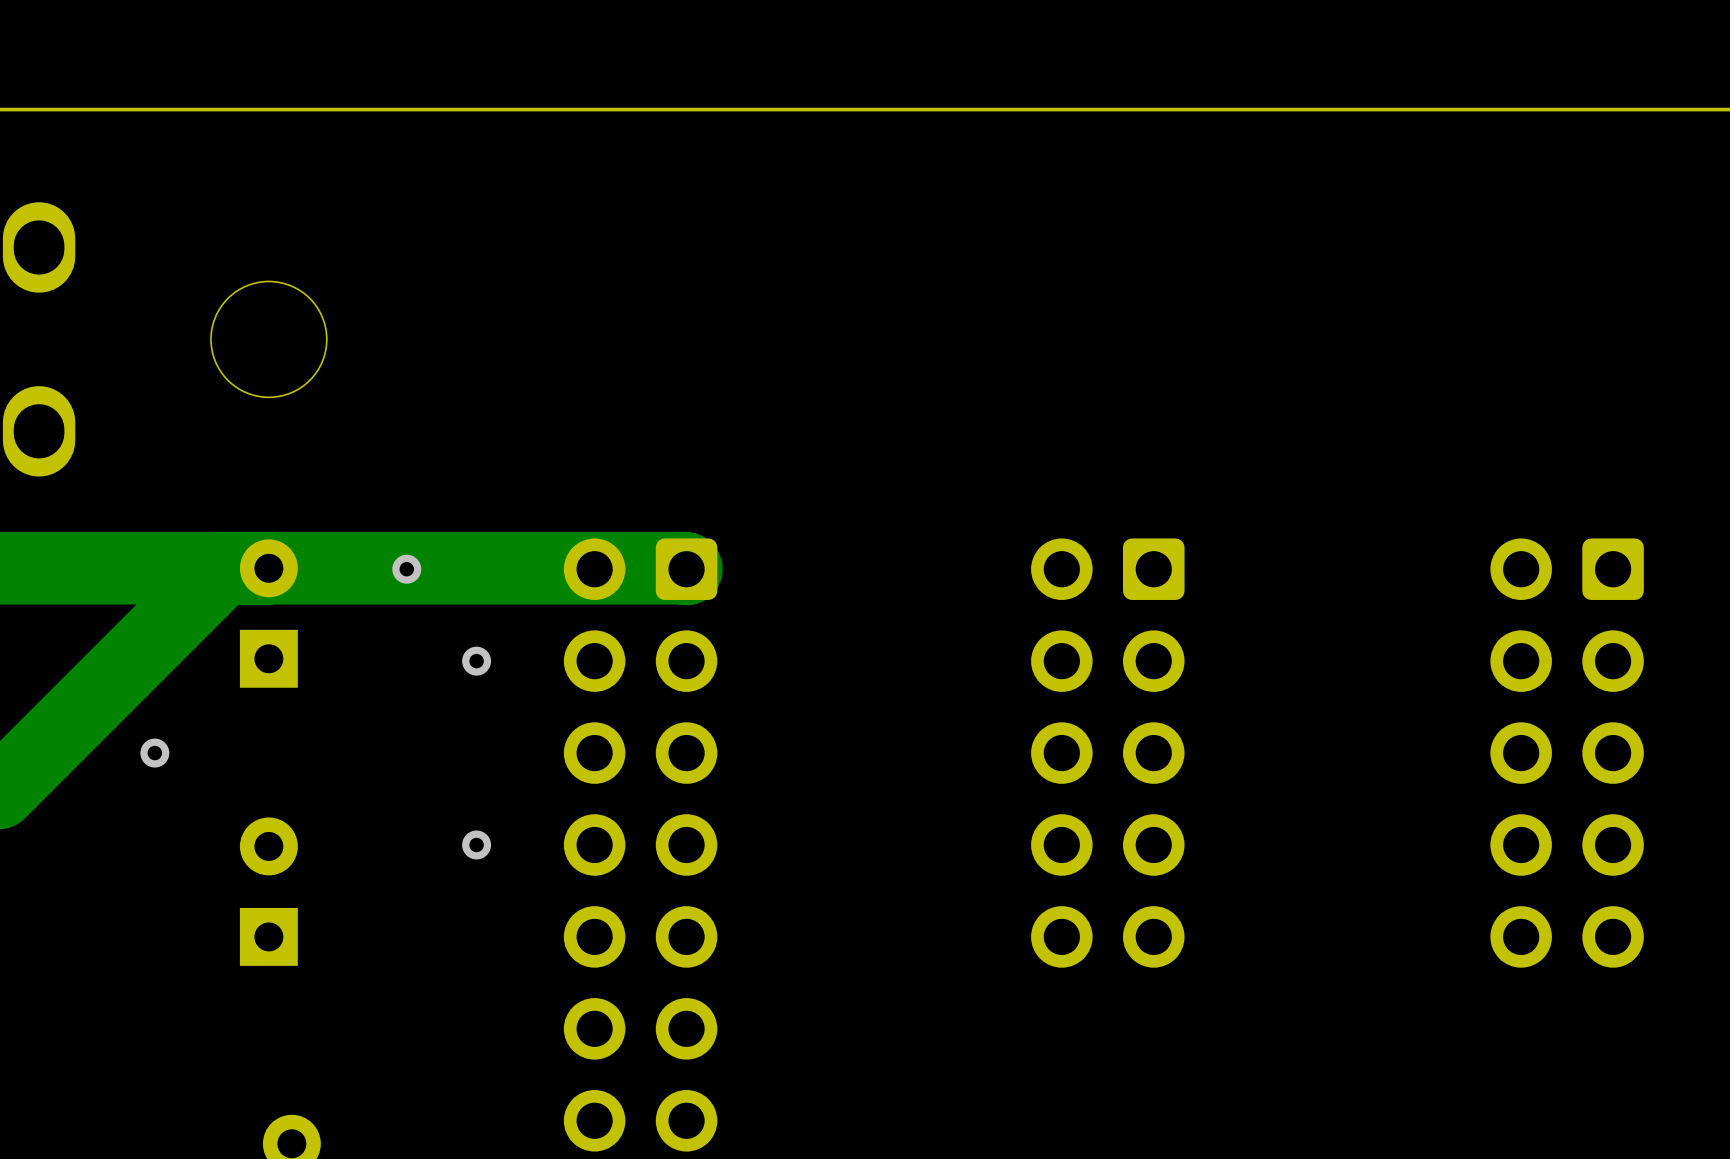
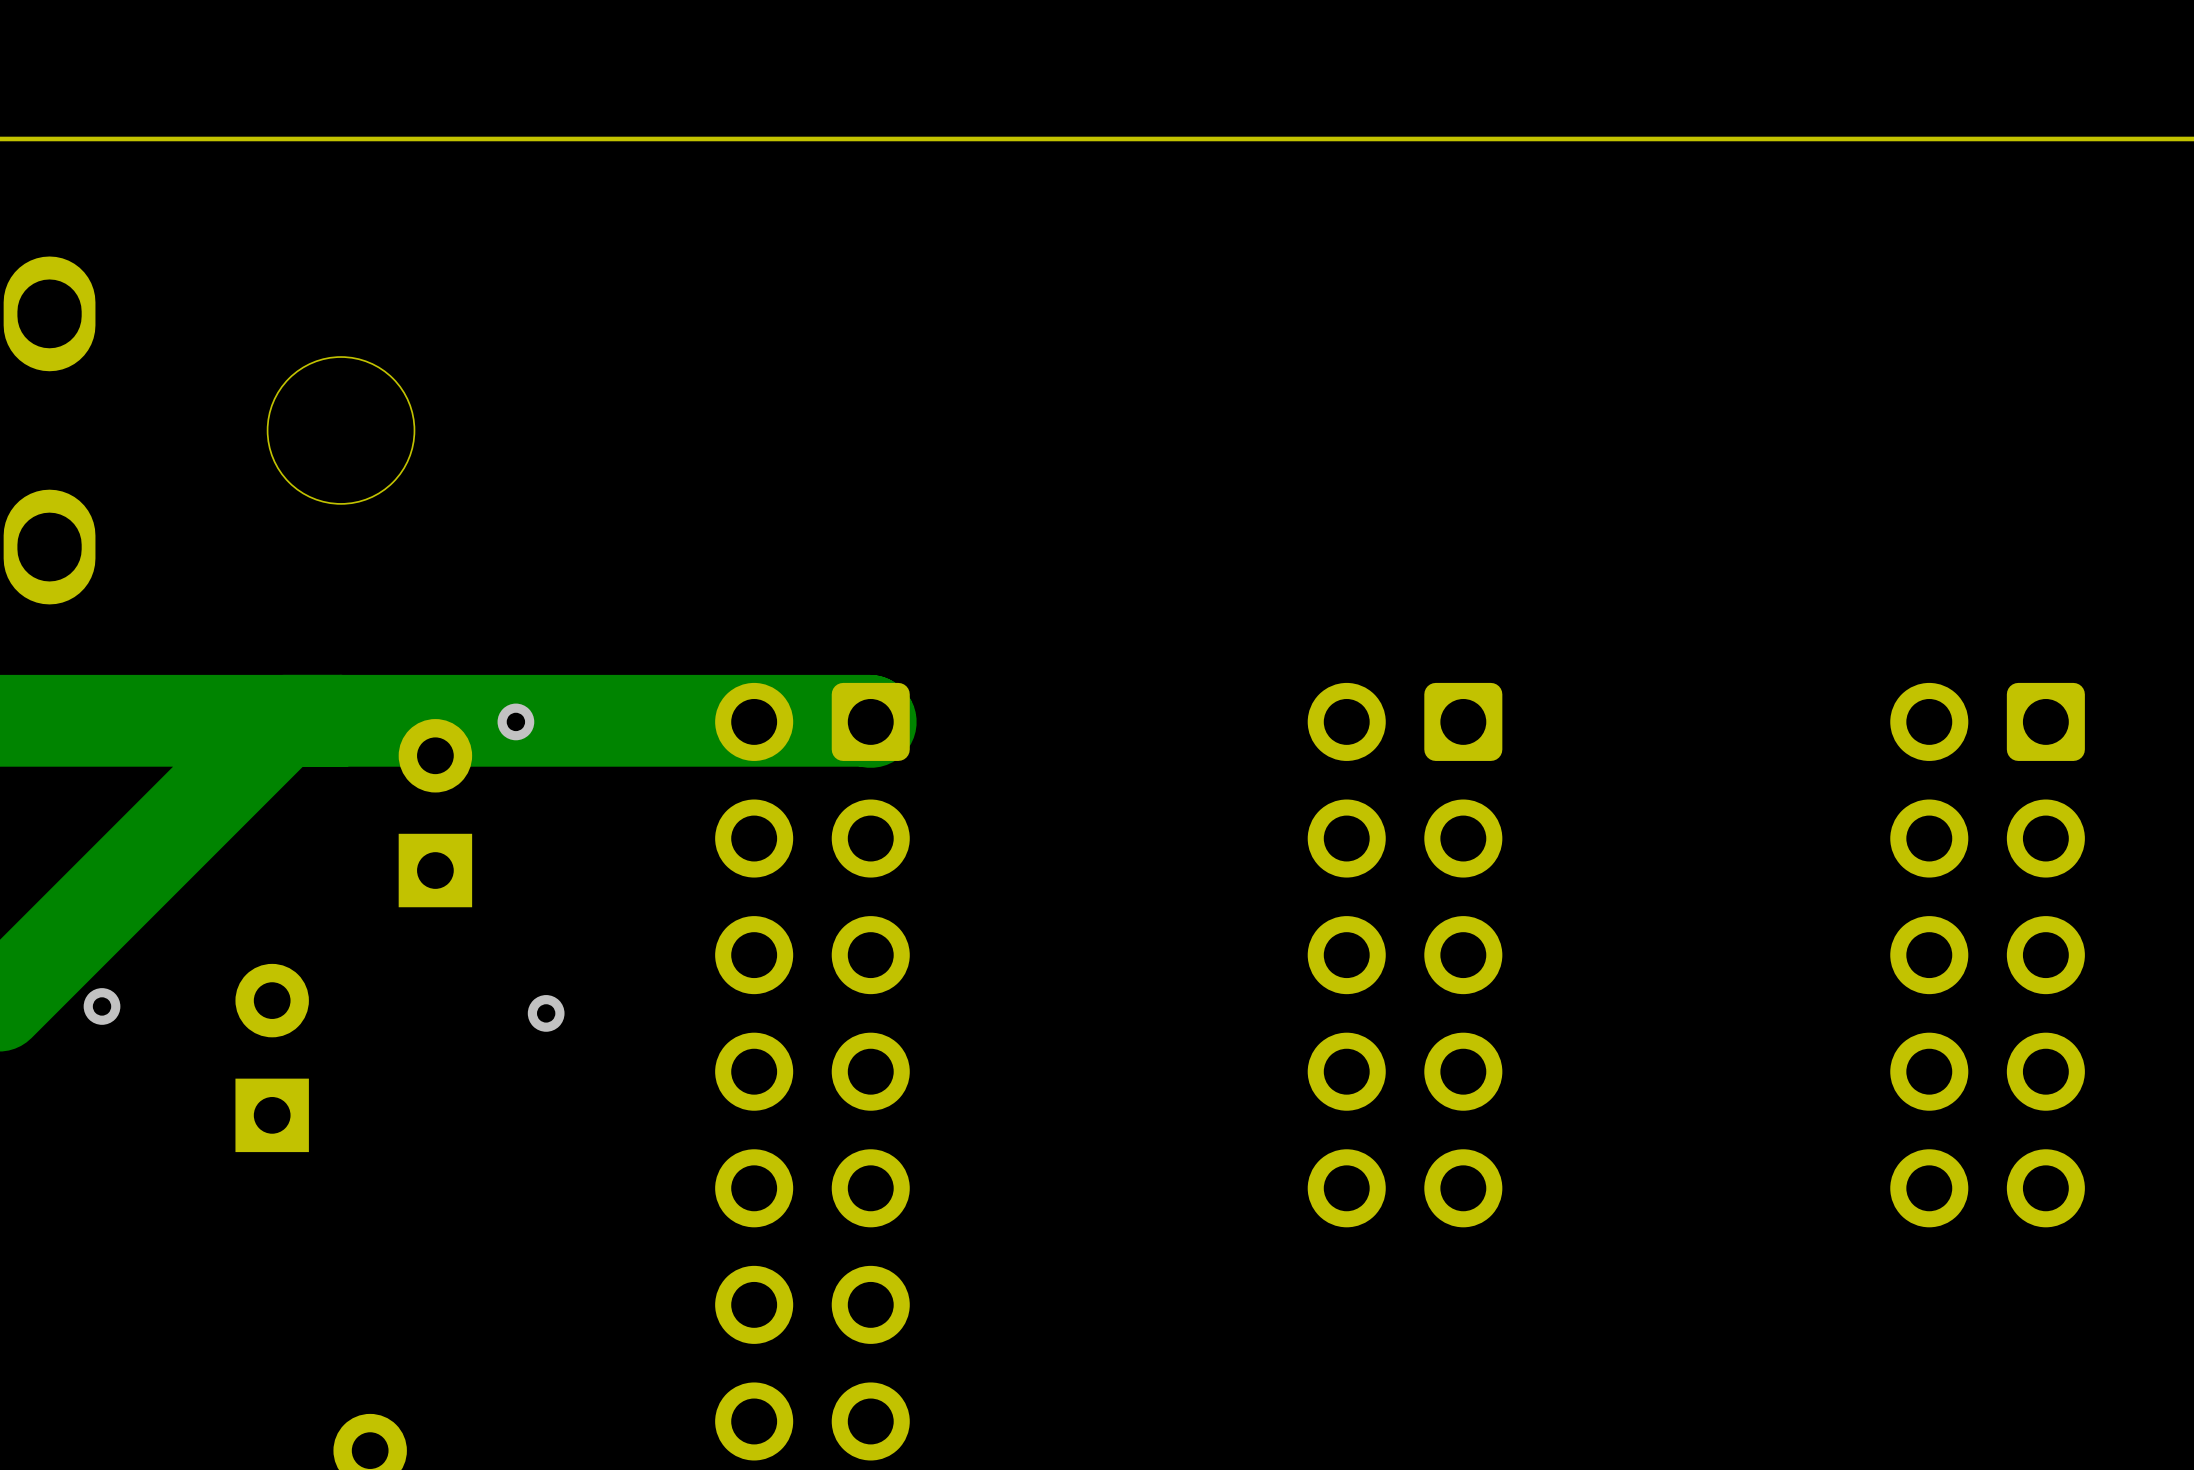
part position: (268, 613) -> (435, 813)
via: (476, 661) -> none
via position: (154, 753) -> (102, 1006)
via position: (476, 844) -> (546, 1013)
part position: (268, 891) -> (272, 1057)

